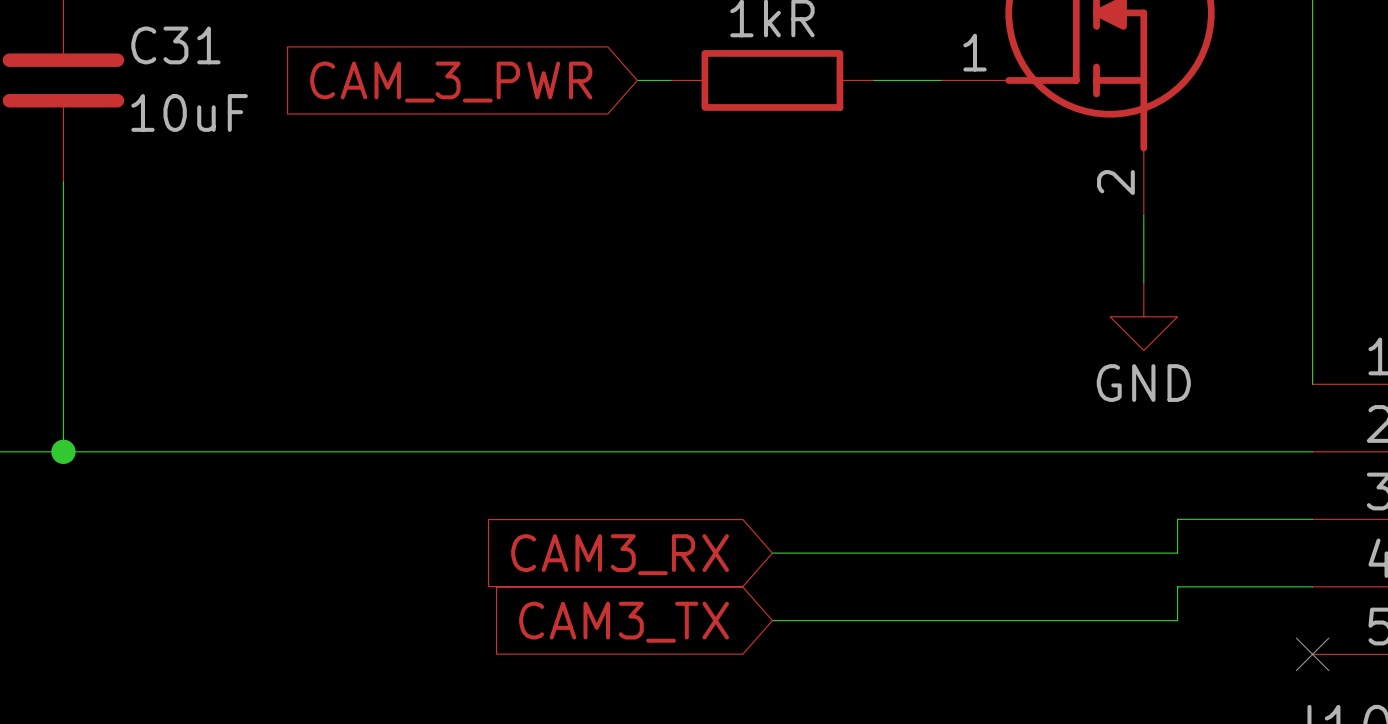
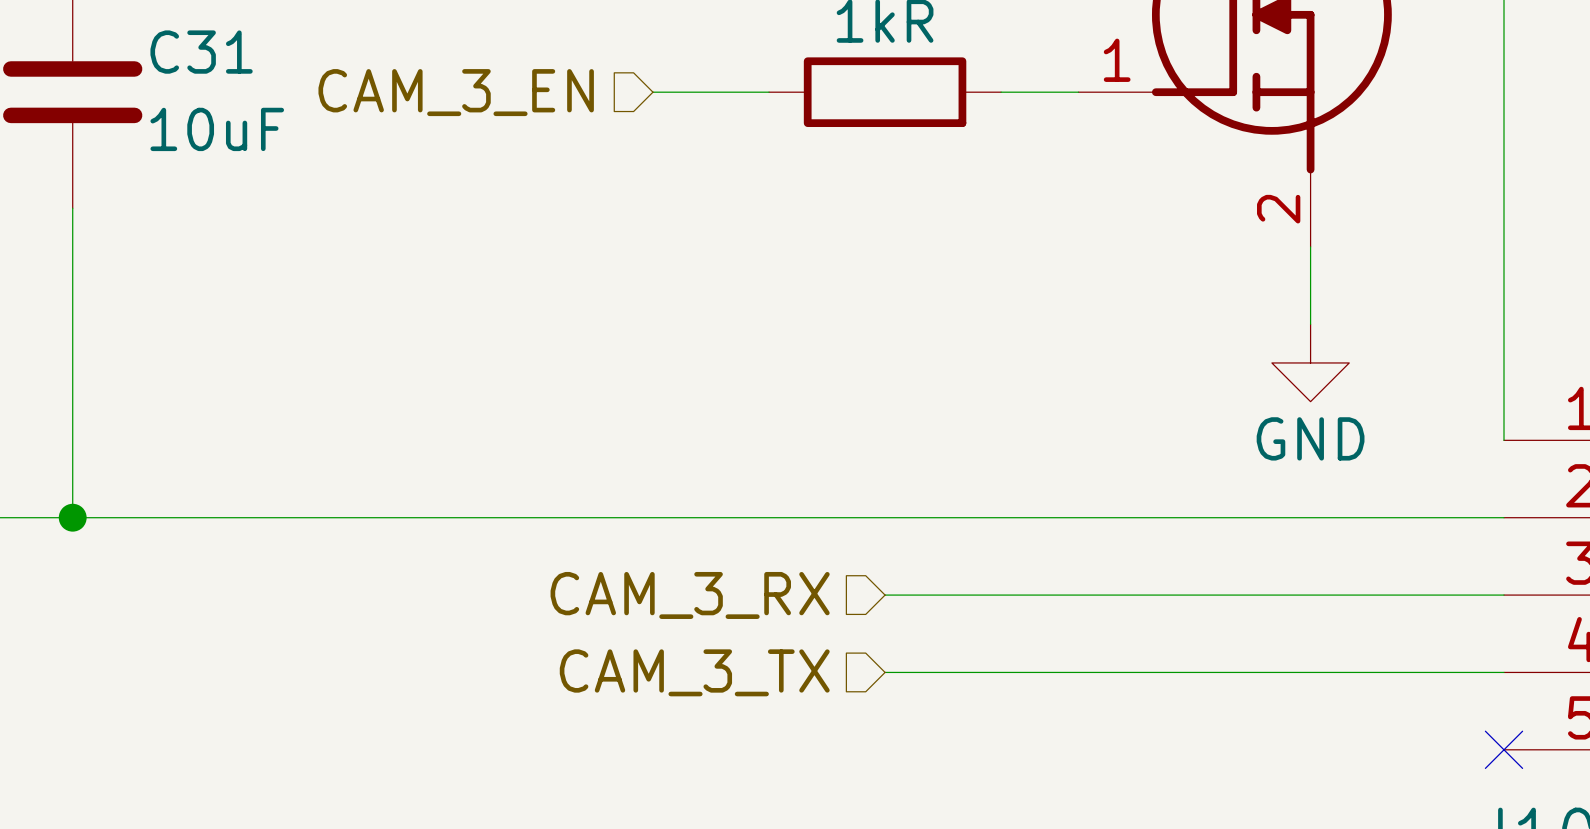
hierarchical label: none -> CAM_3_EN (456, 92)
wire: none -> (652, 92) (730, 92)
global label: CAM_3_PWR (451, 82) -> none
hierarchical label: none -> CAM_3_RX (690, 595)
wire: (1177, 519) (1177, 553) (772, 553) -> (1349, 595) (885, 595)
global label: CAM3_RX (620, 554) -> none
wire: (1177, 586) (1177, 620) (772, 620) -> (1349, 672) (885, 672)
hierarchical label: none -> CAM_3_TX (694, 672)
global label: CAM3_TX (624, 622) -> none

